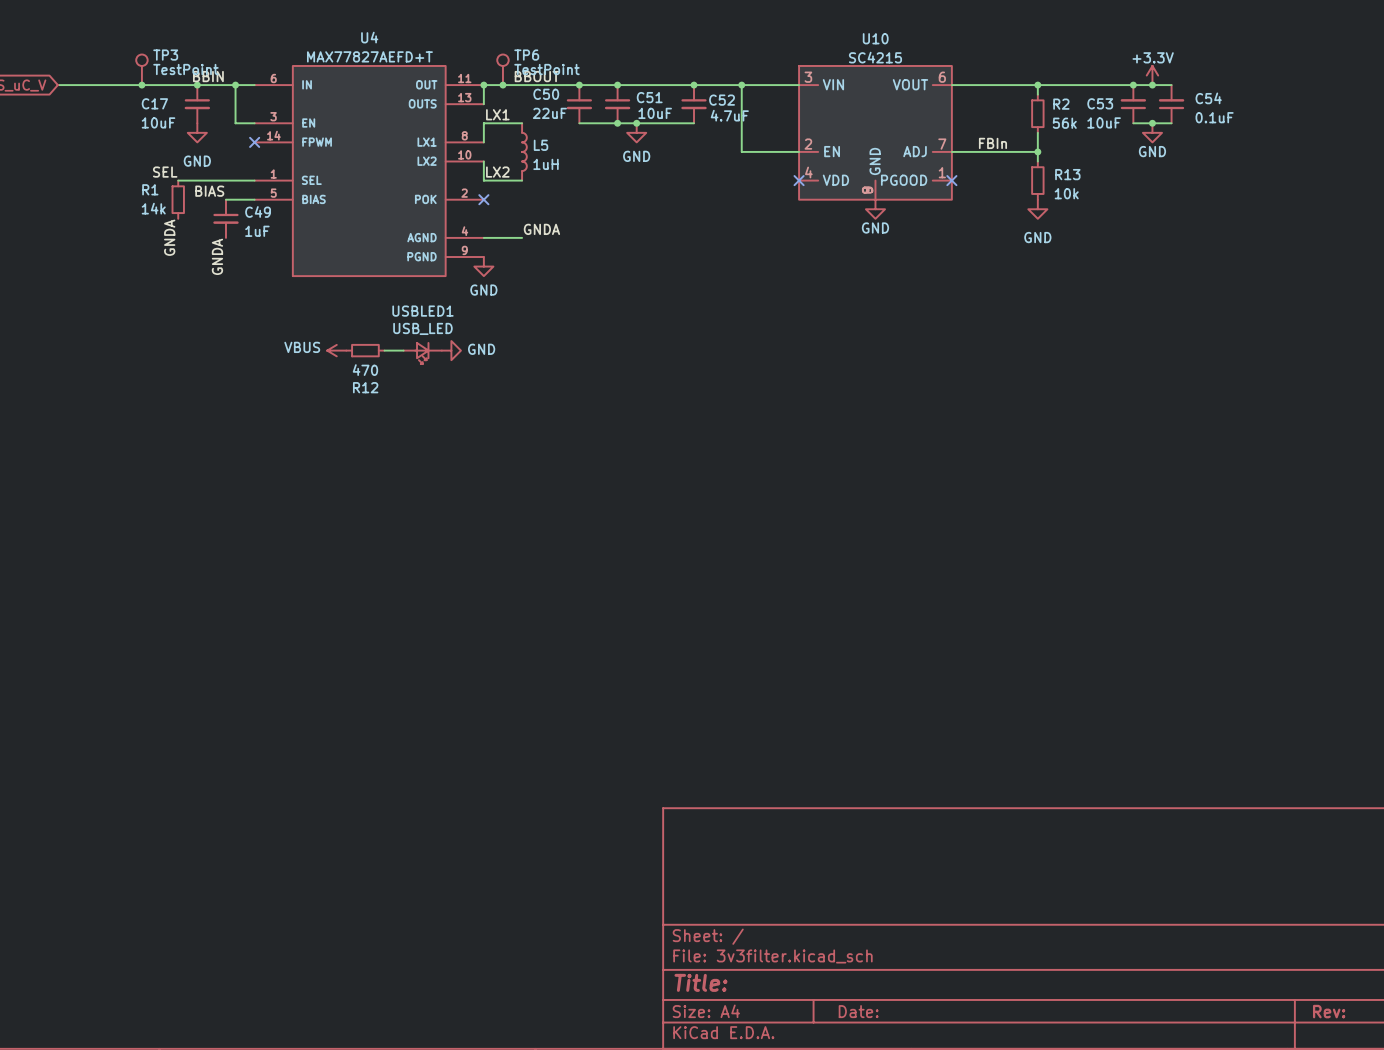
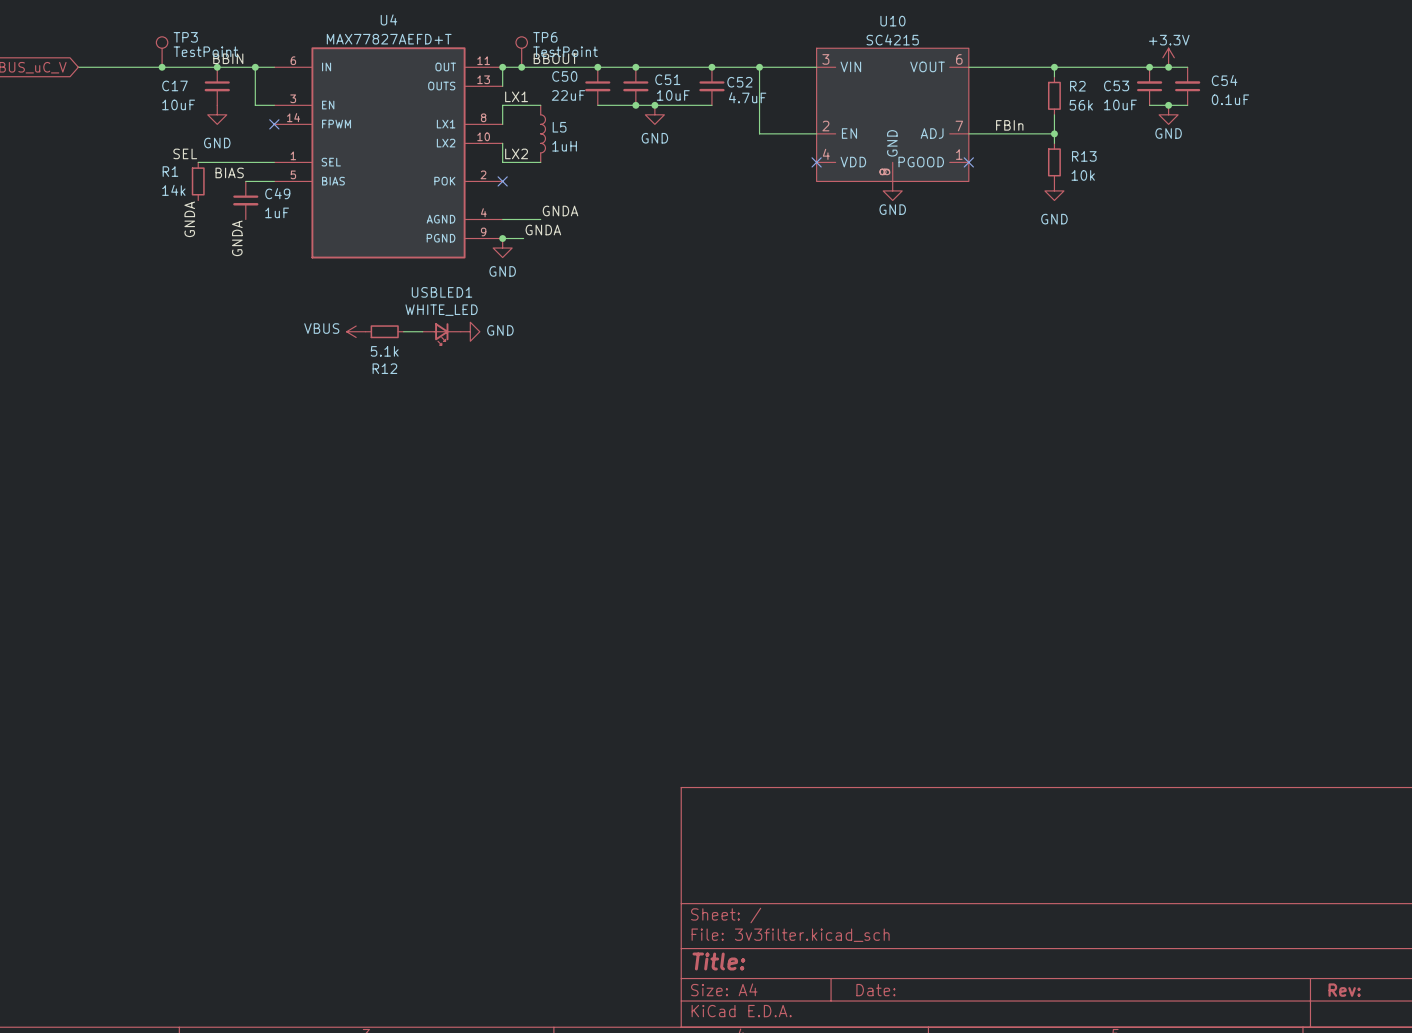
label: none -> GNDA (543, 230)
wire: none -> (502, 238) (523, 238)
junction: none -> (502, 238)
USBLED1 value: USB_LED (422, 328) -> WHITE_LED (441, 310)
R12 value: 470 (365, 370) -> 5.1k (384, 351)

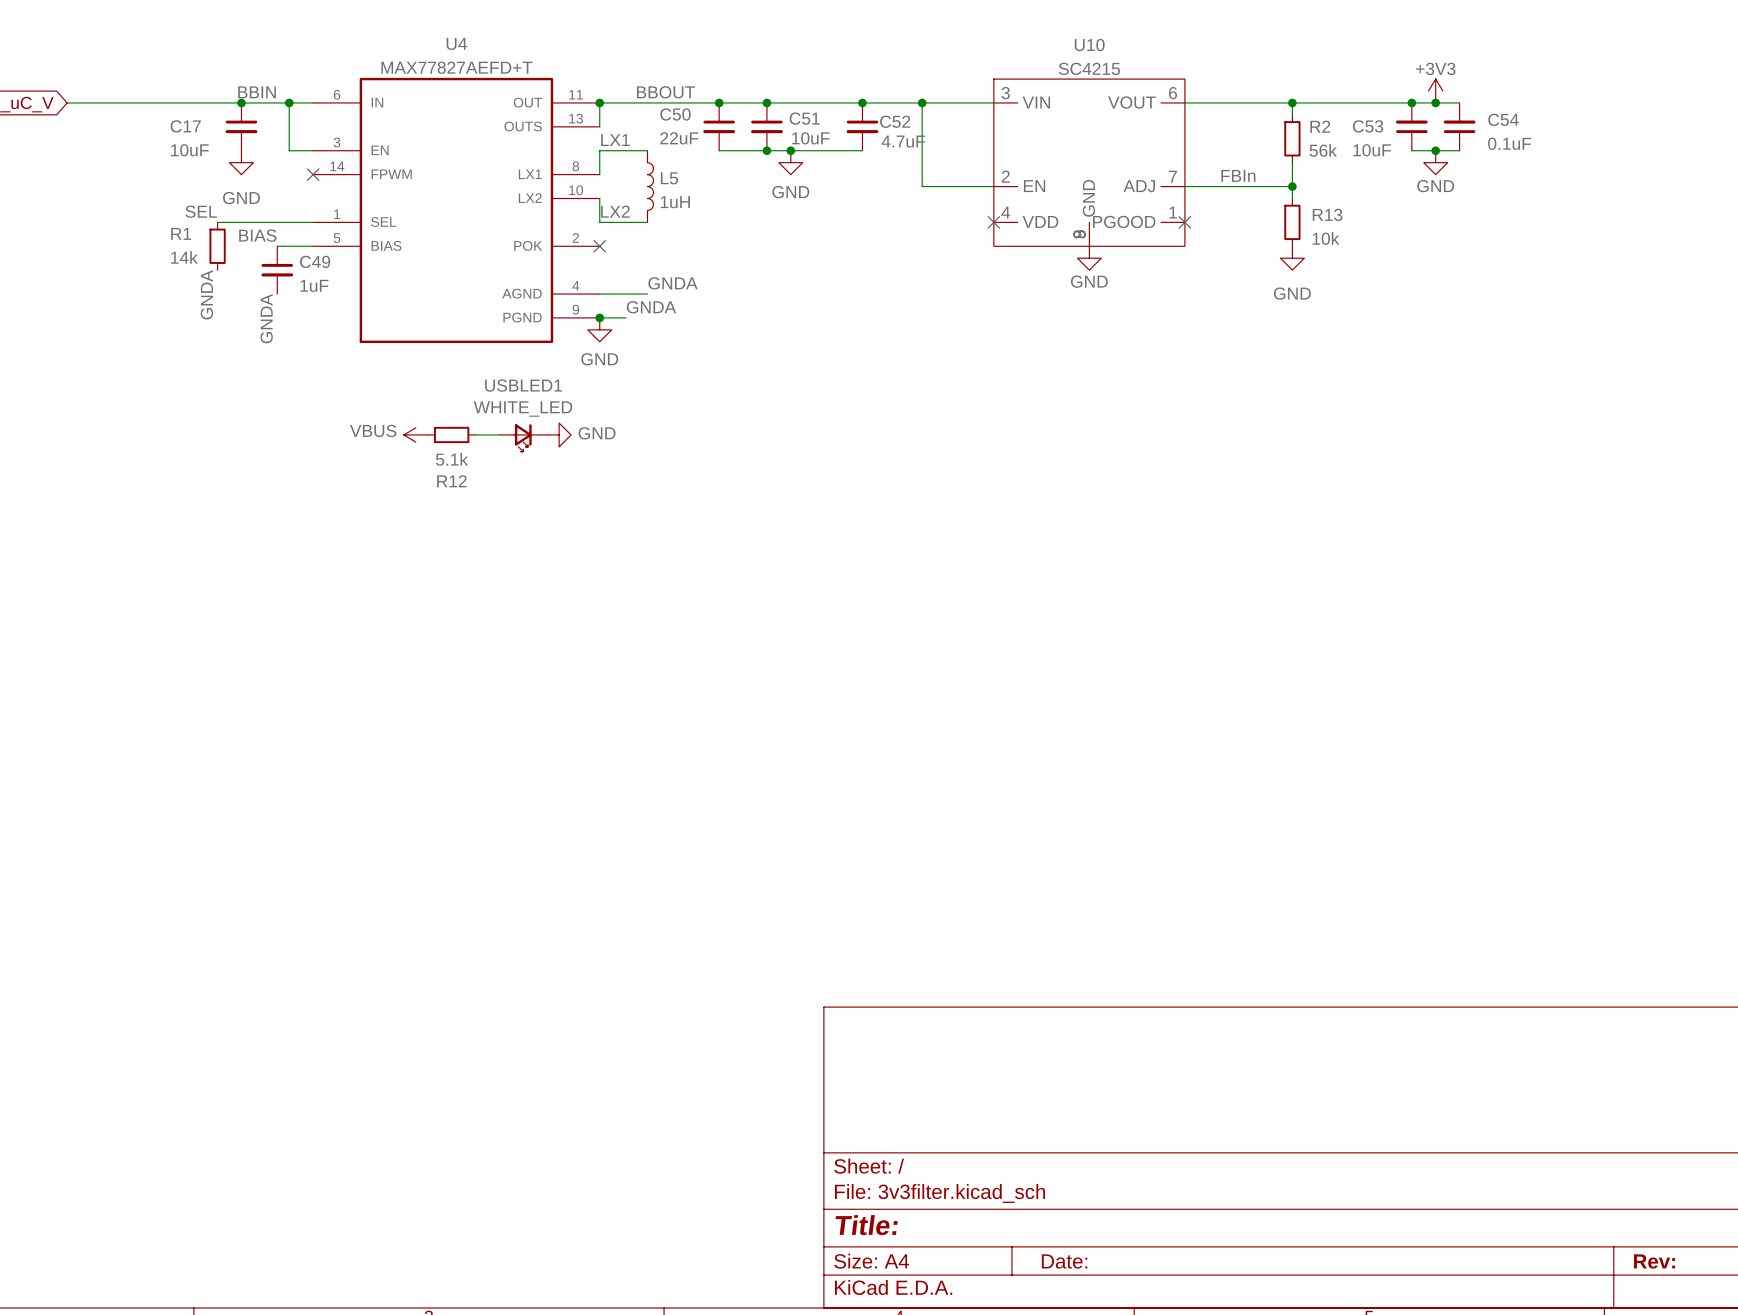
TP3: TestPoint (162, 52) -> none
TP6: TestPoint (521, 52) -> none
power symbol: +3.3V (1168, 57) -> +3V3 (1435, 91)
junction: (162, 67) -> none
junction: (521, 67) -> none

